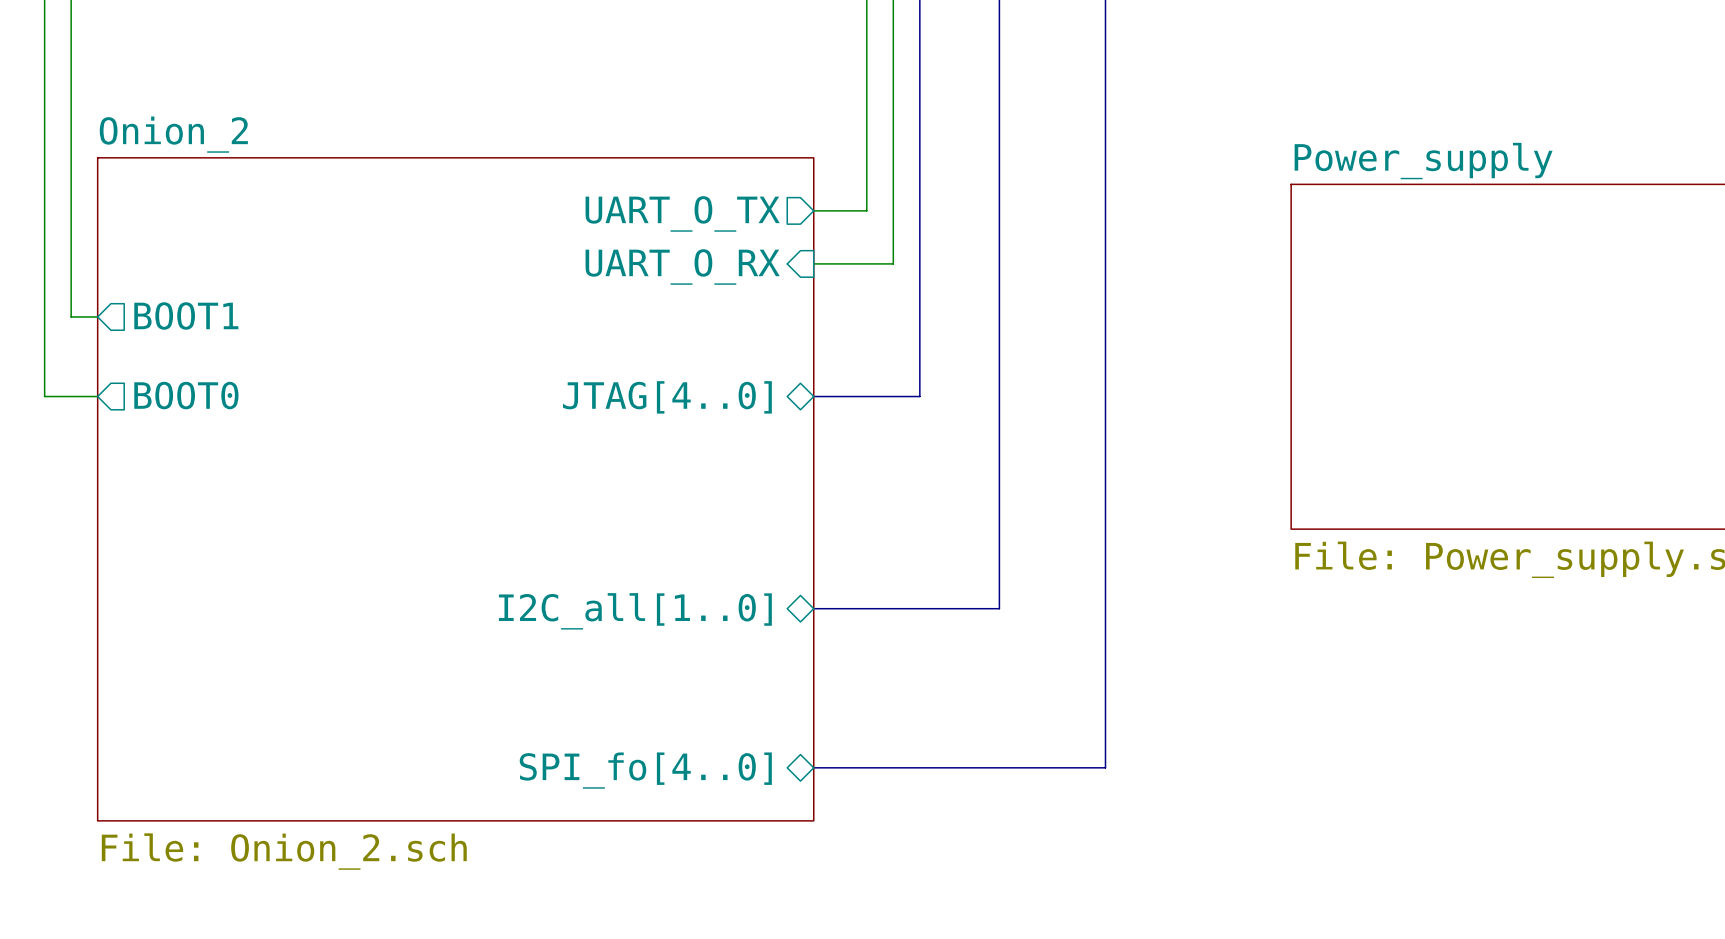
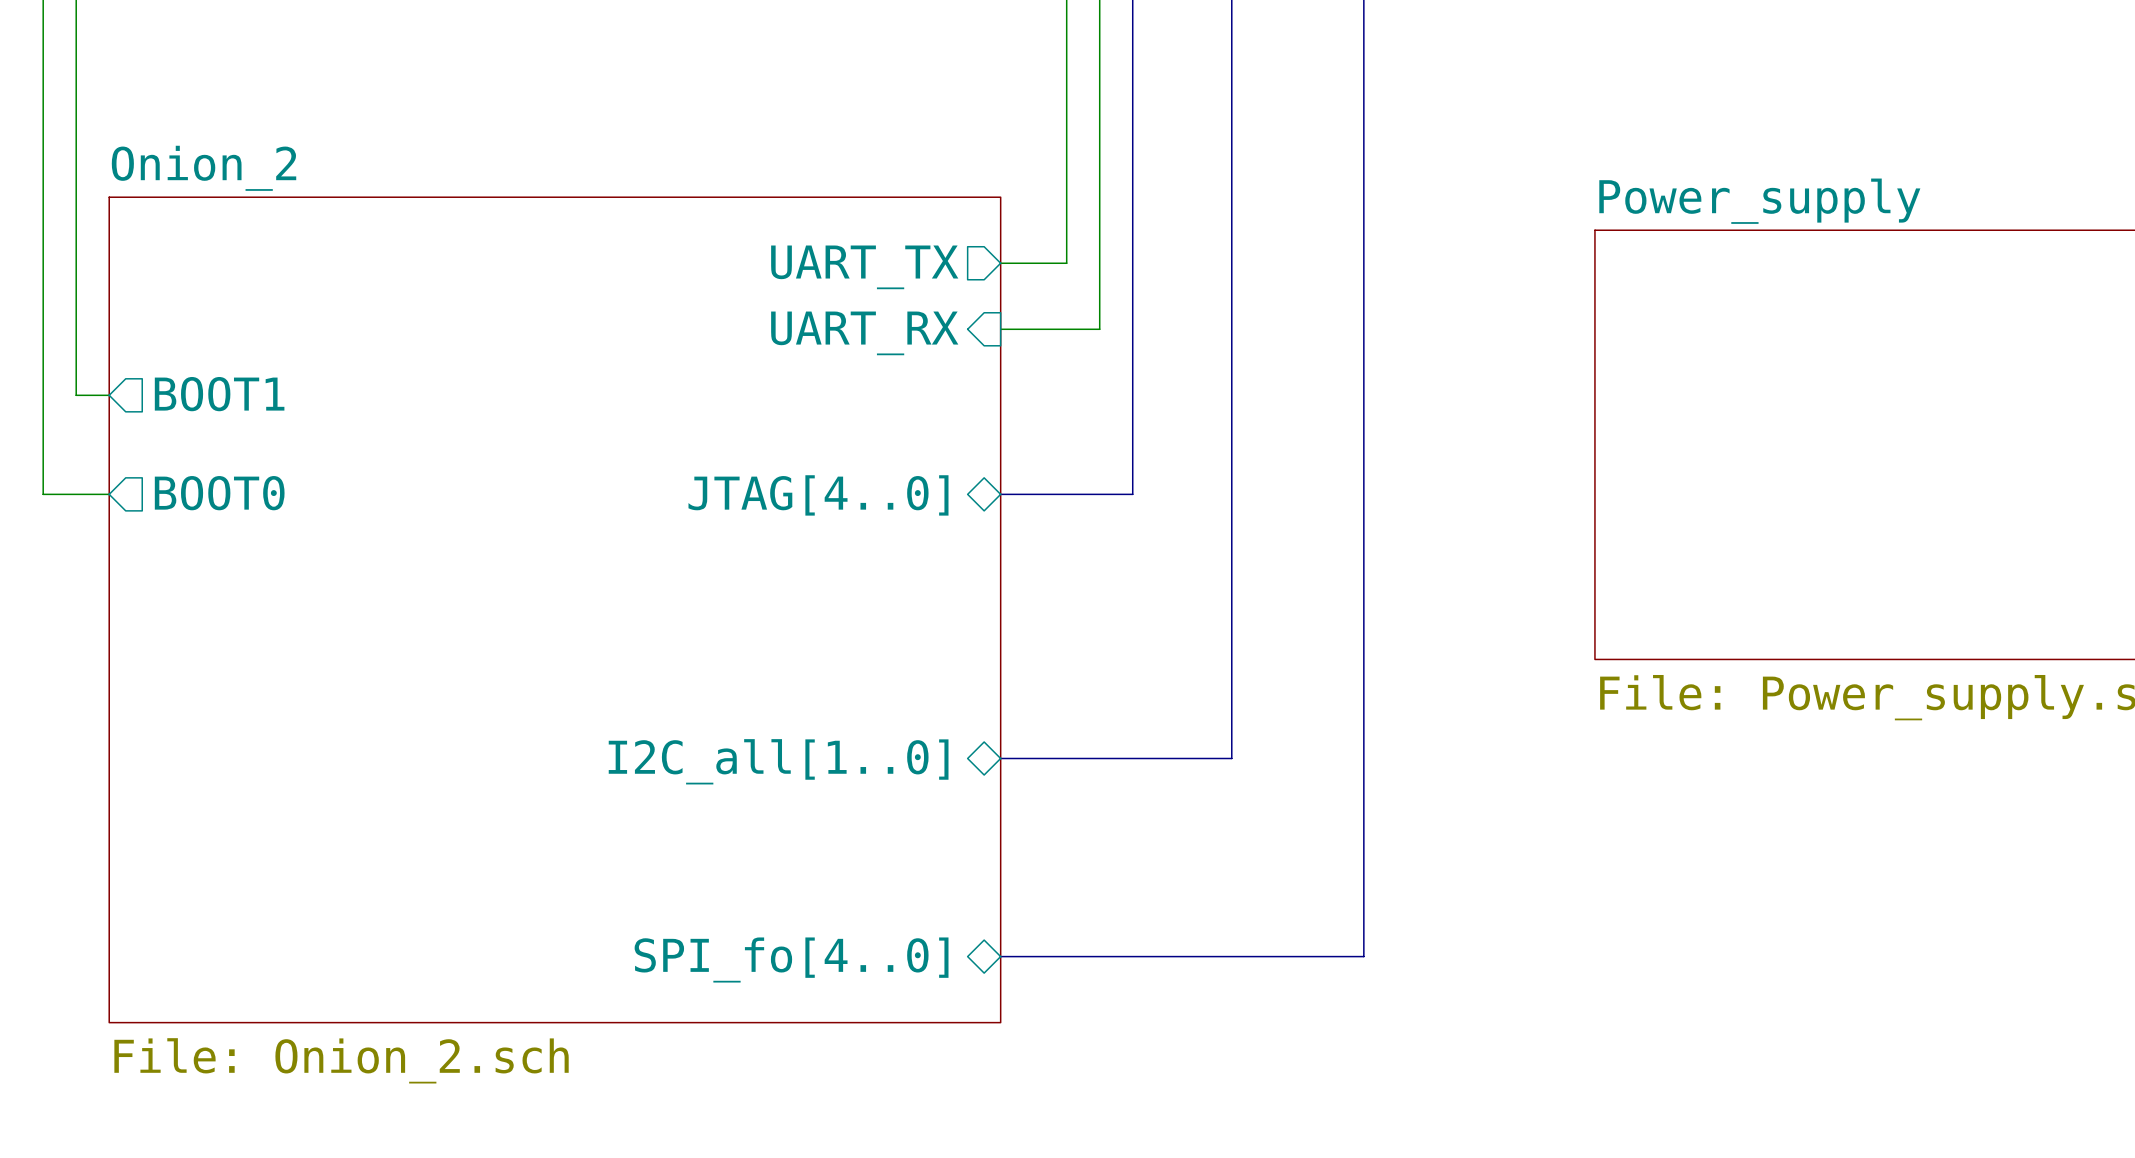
sheet pin: UART_O_TX (682, 213) -> UART_TX (864, 267)
sheet pin: UART_O_RX (682, 266) -> UART_RX (864, 333)

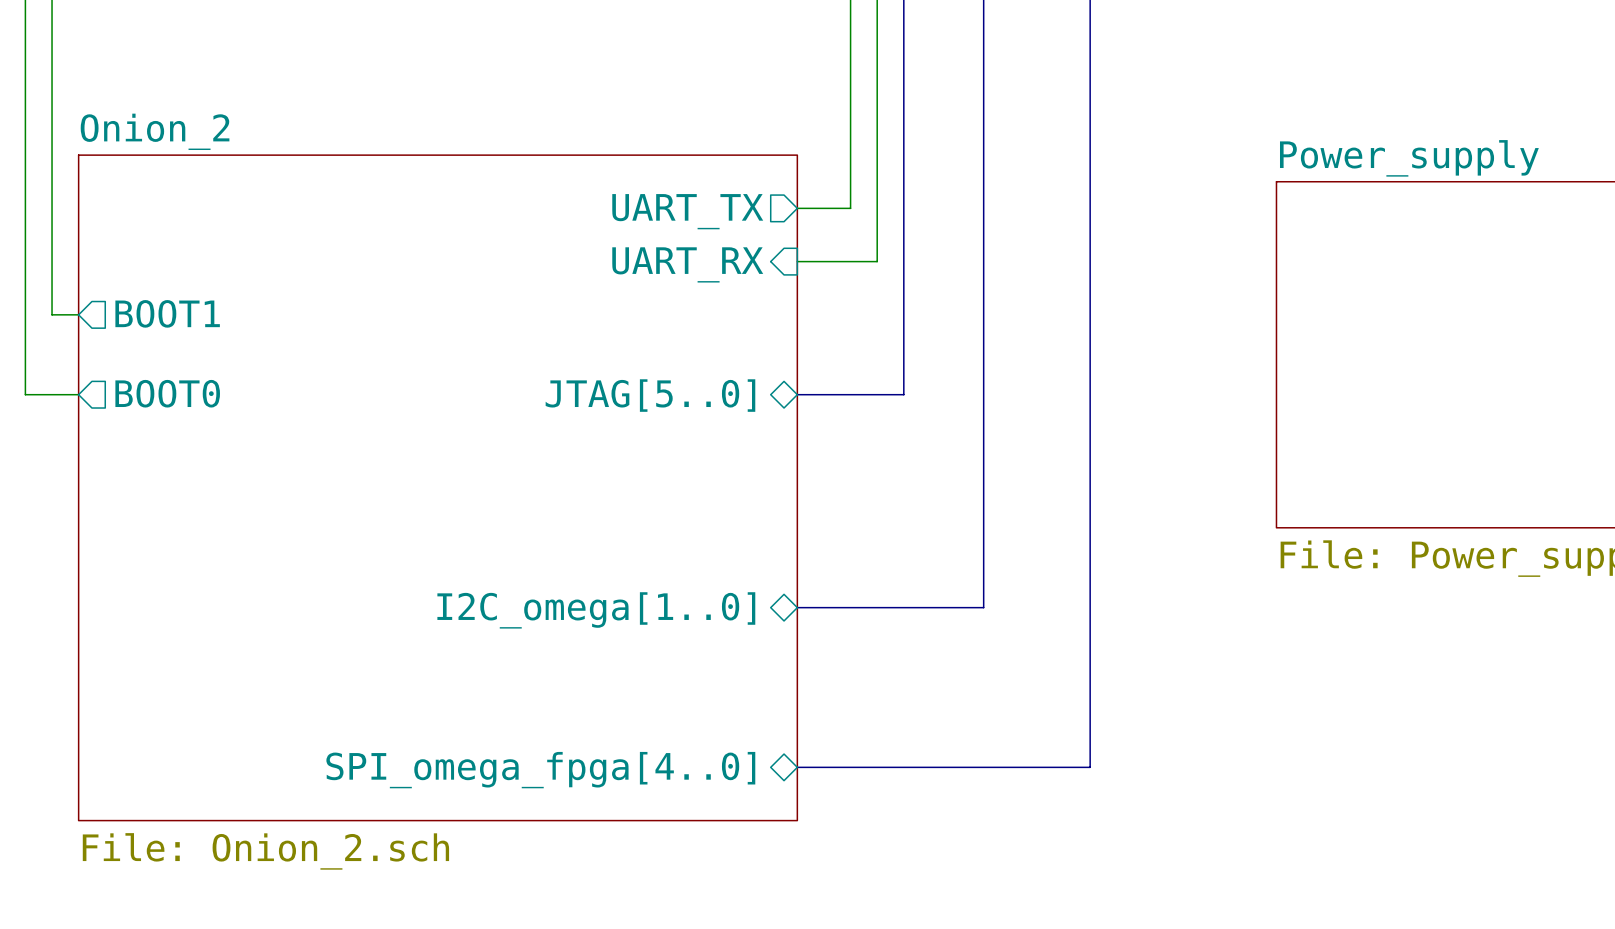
sheet pin: JTAG[4..0] (818, 495) -> JTAG[5..0] (650, 395)
sheet pin: I2C_all[1..0] (778, 761) -> I2C_omega[1..0] (596, 610)
sheet pin: SPI_fo[4..0] (791, 960) -> SPI_omega_fpga[4..0] (540, 770)

